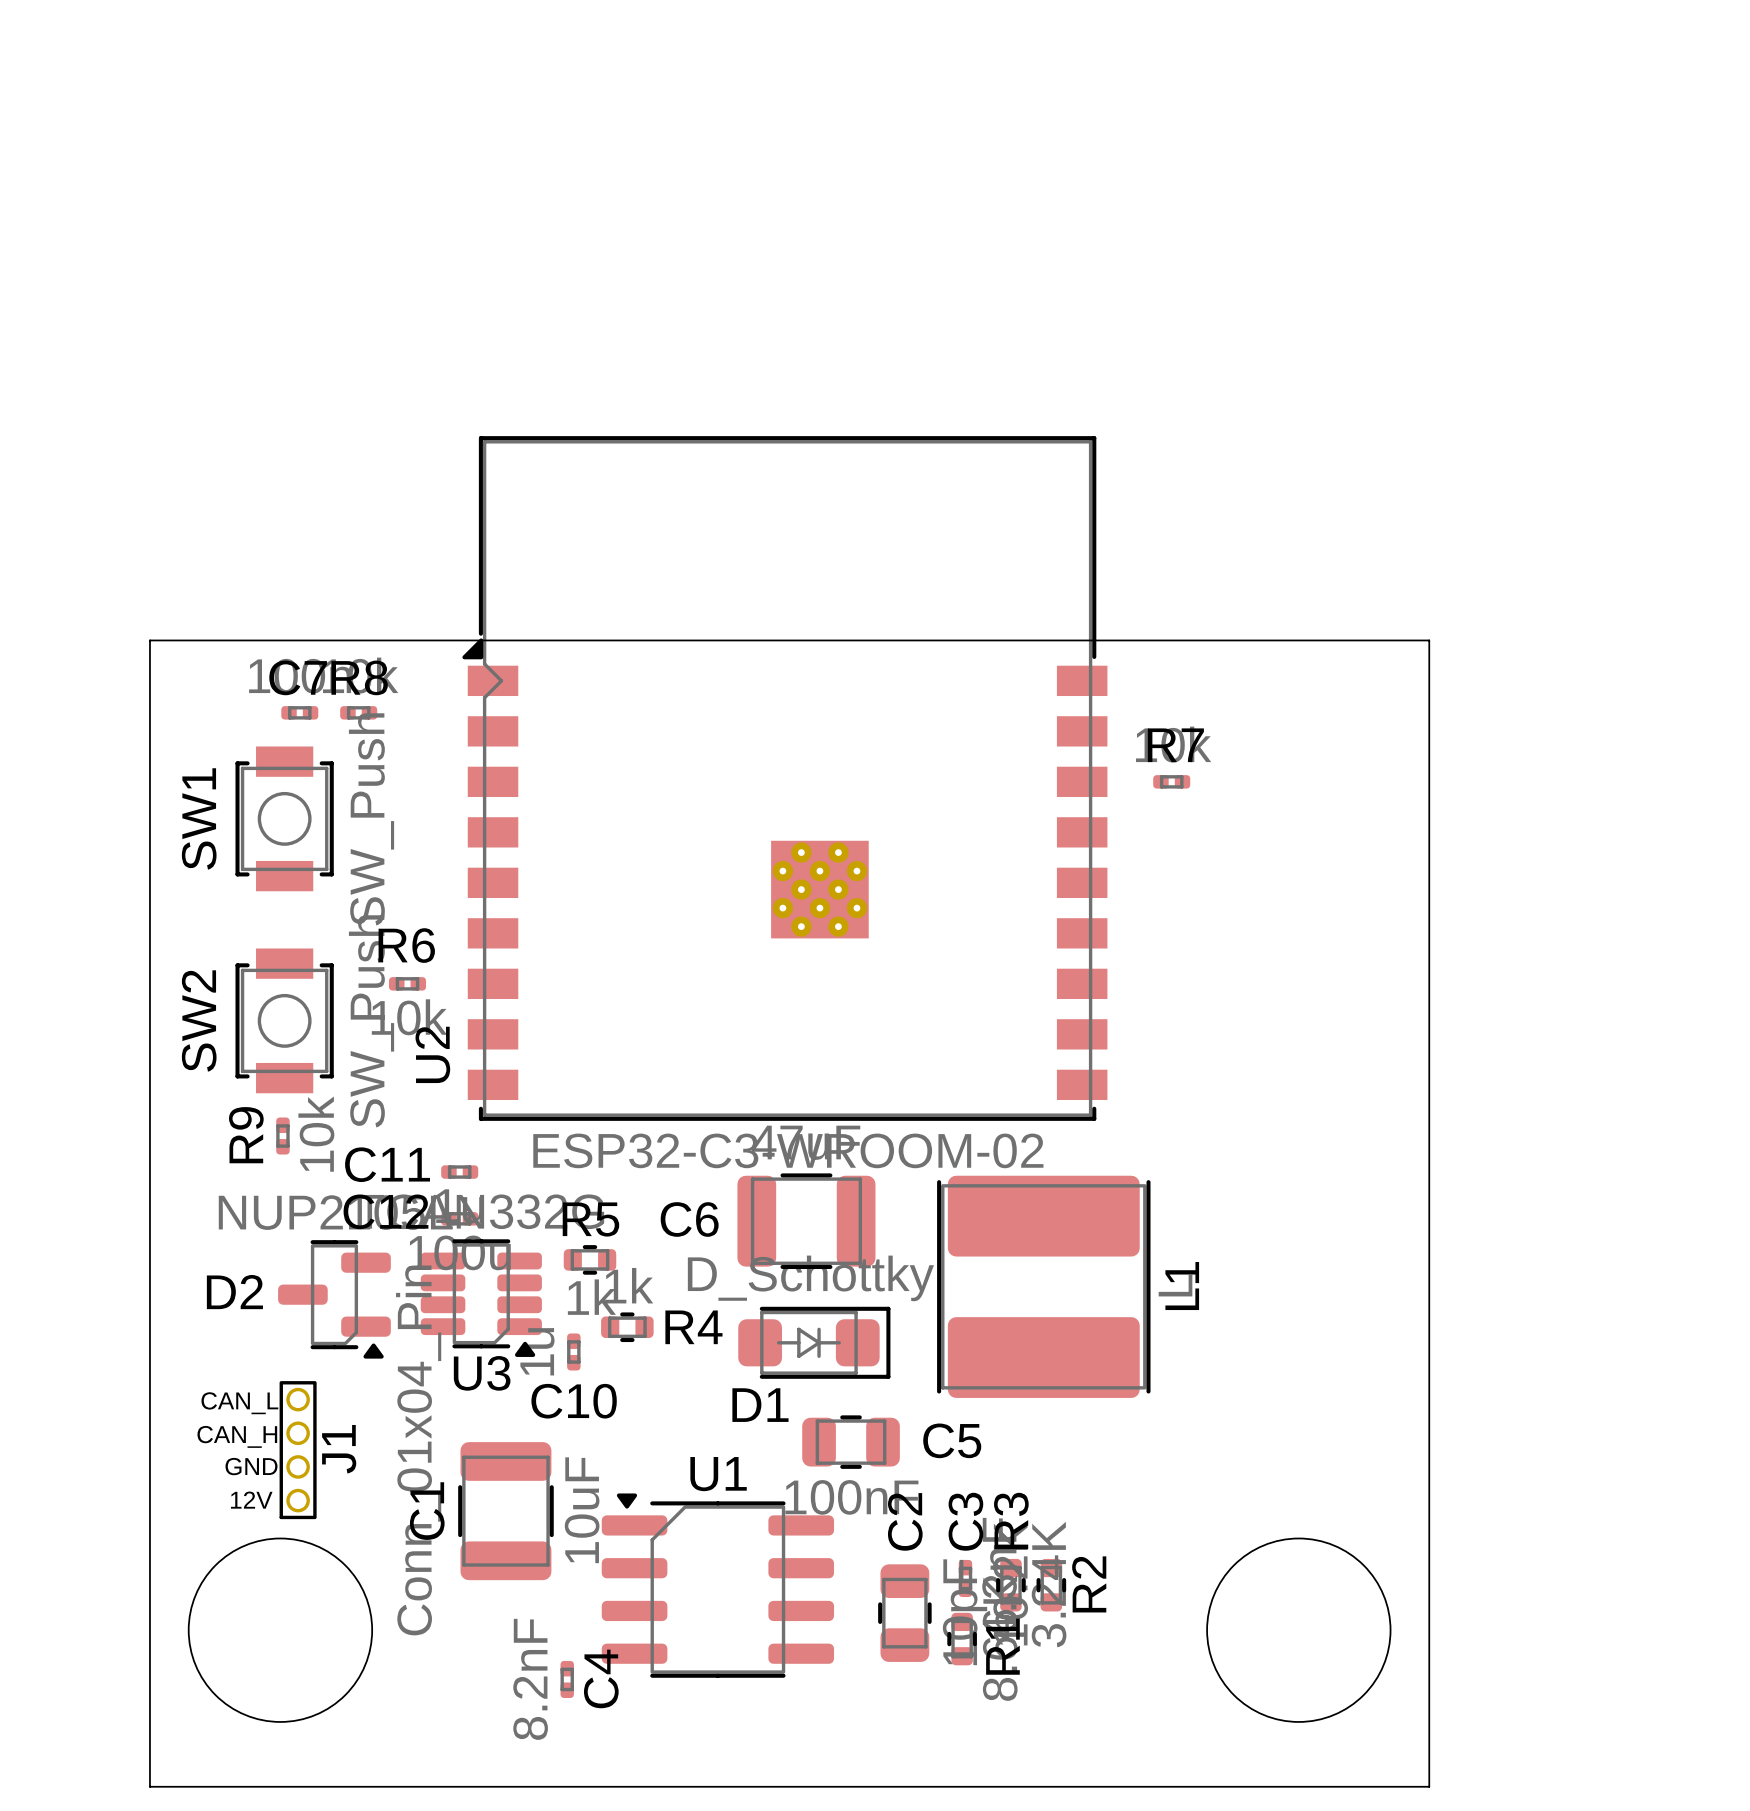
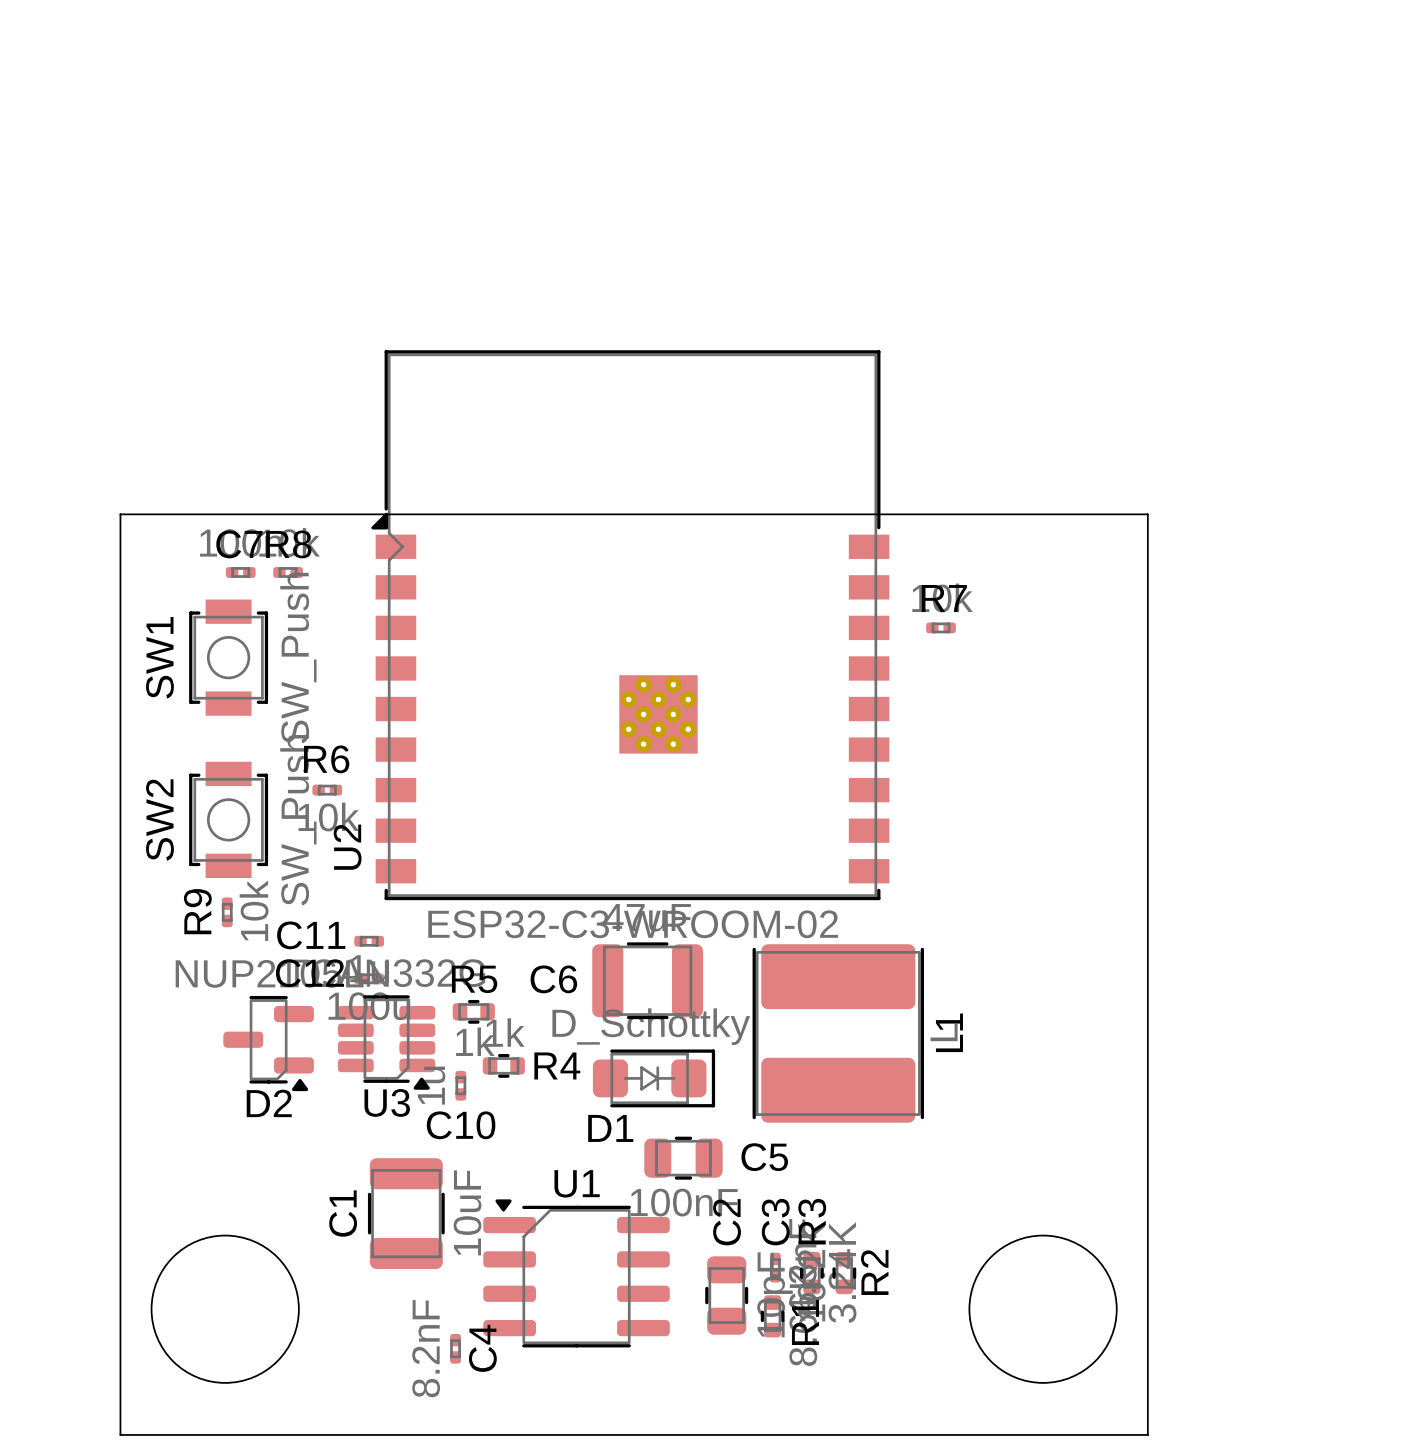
D2 name position: D2 (234, 1292) -> D2 (269, 1103)
J1: Conn_01x04_Pin (298, 1450) -> none

